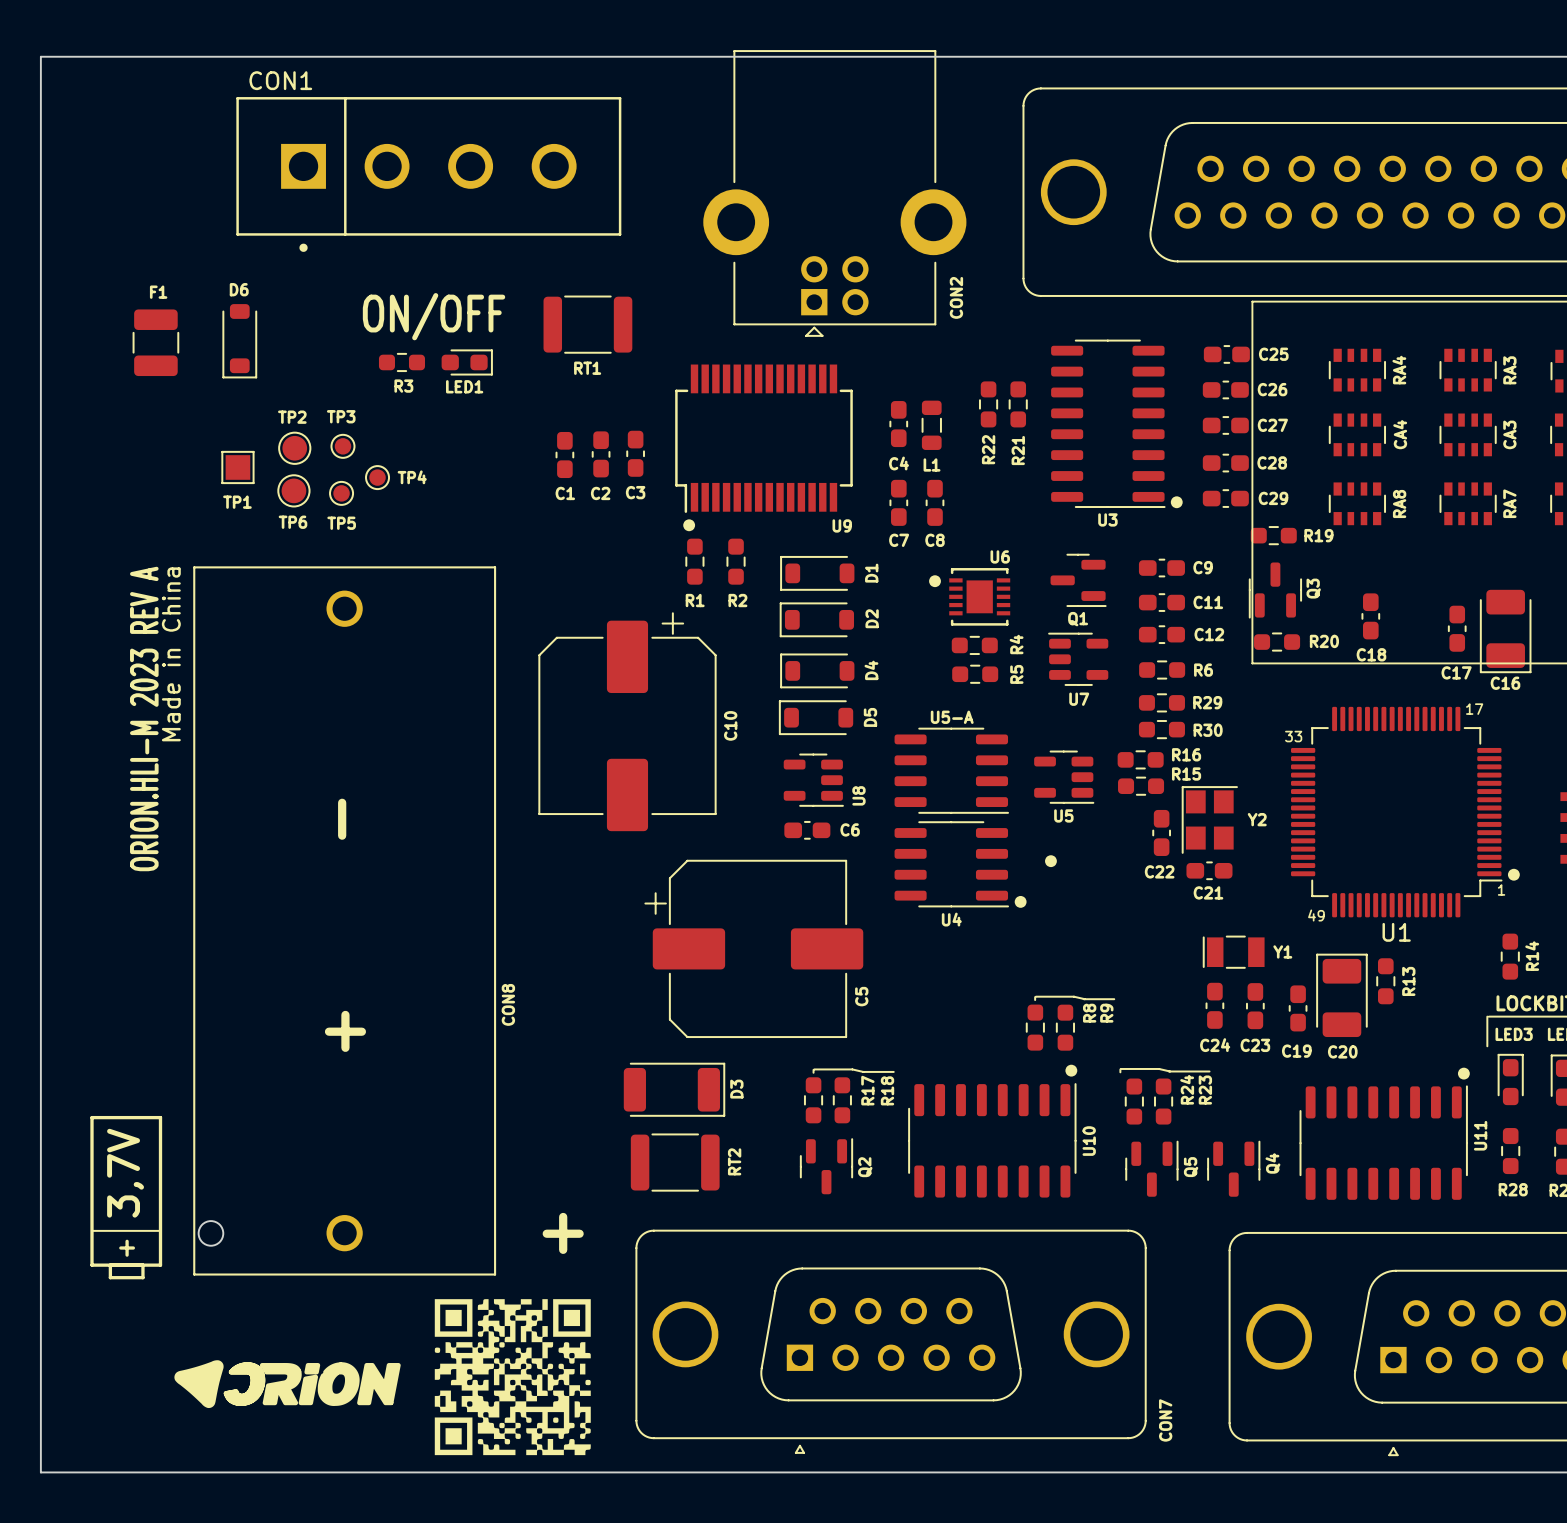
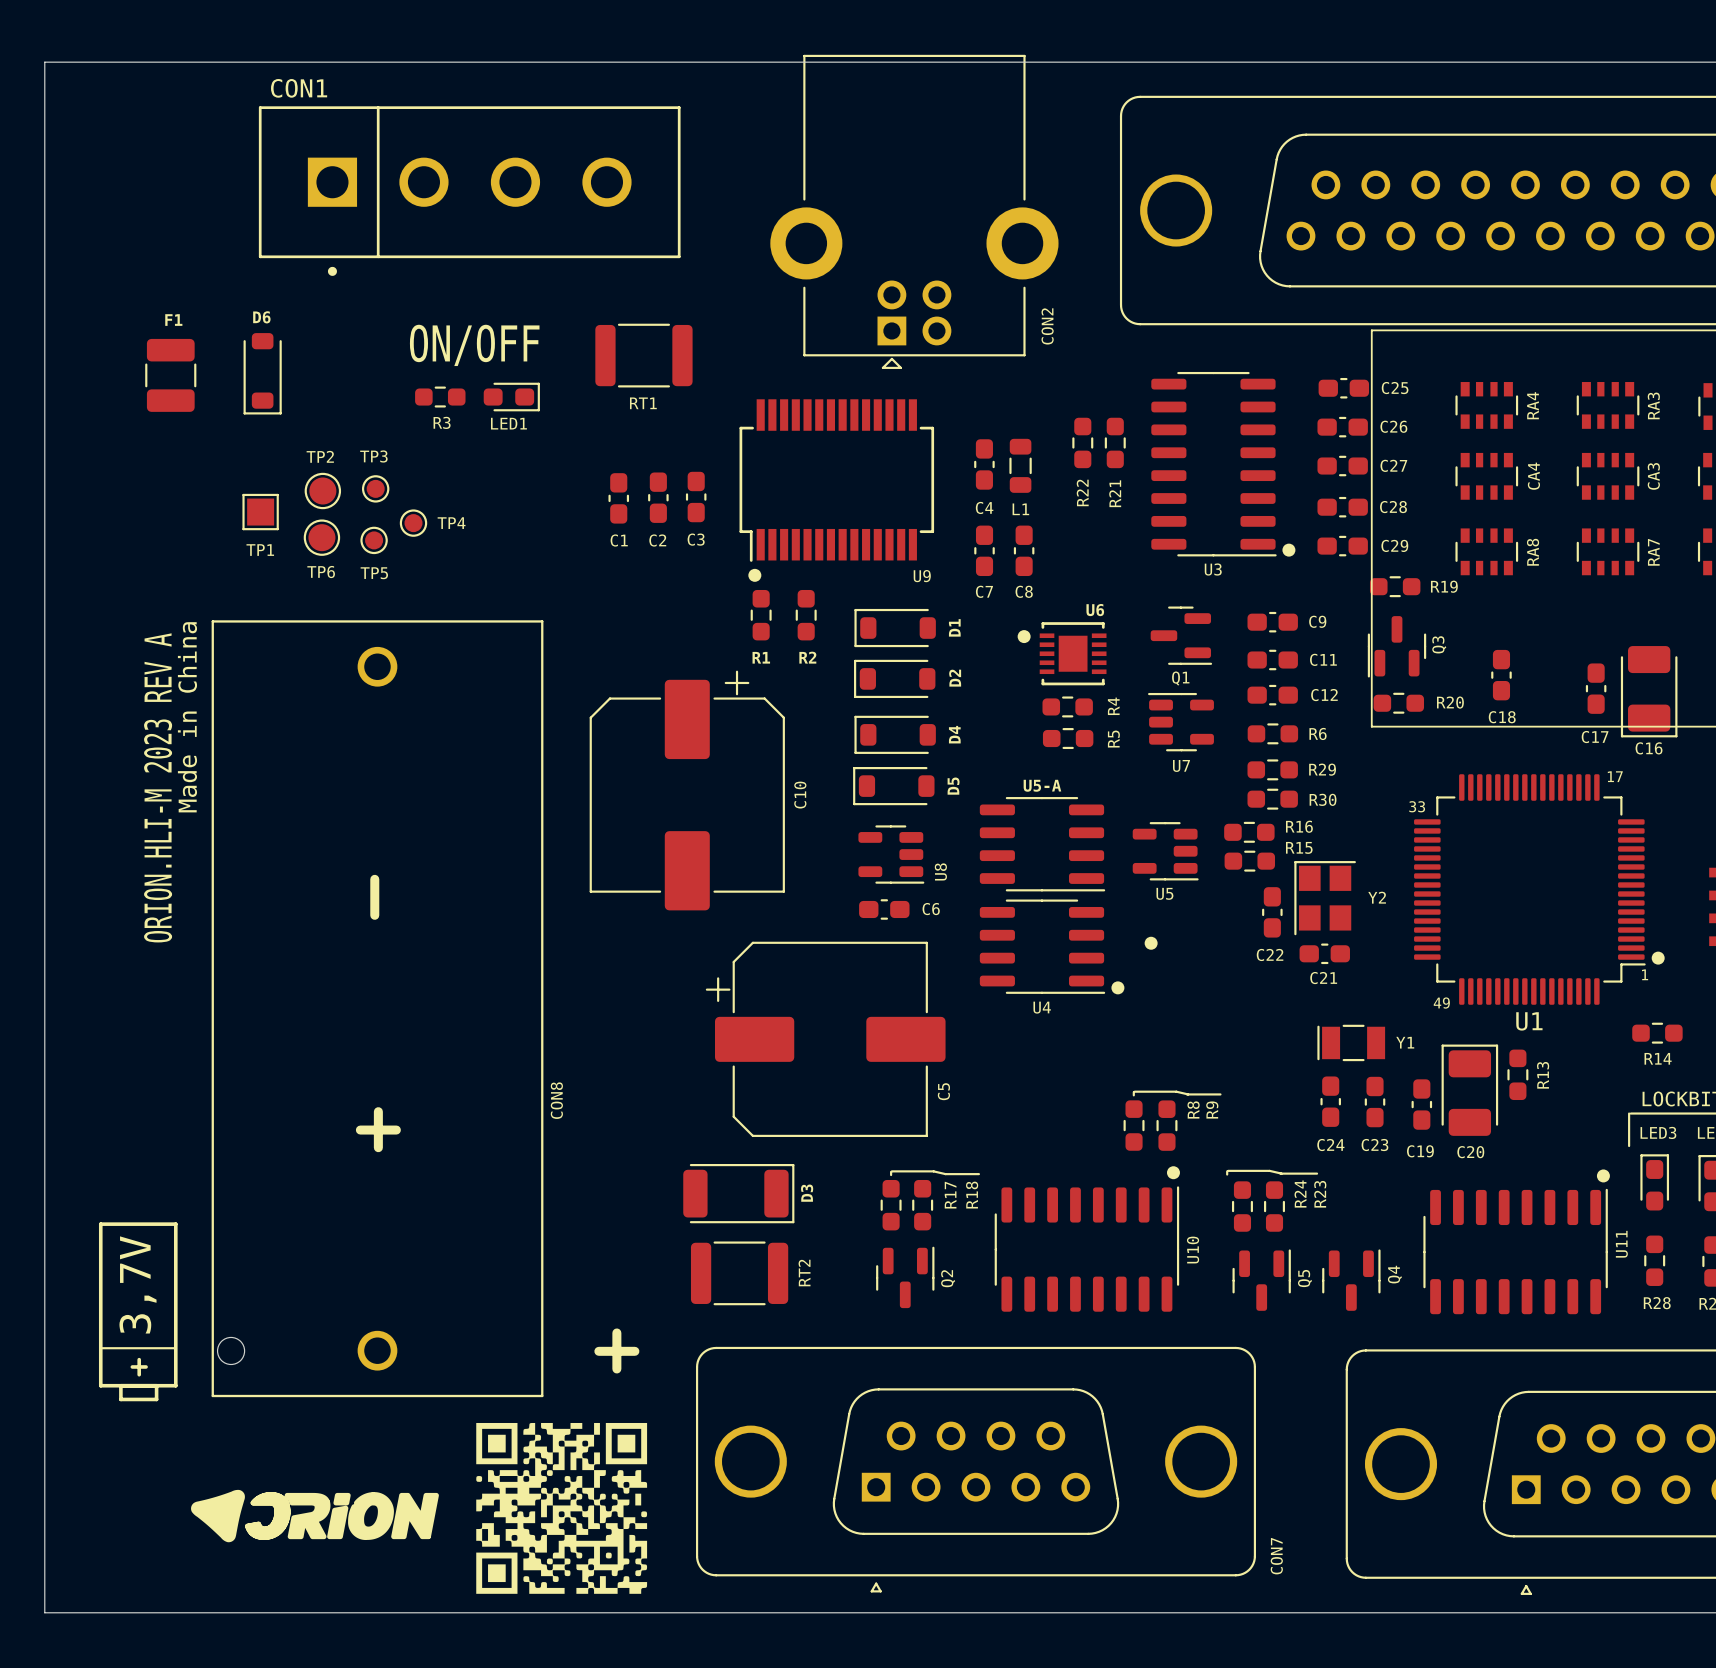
R14 rotation: 0° (1510, 956) -> 90° clockwise (1657, 1033)
line: (1202, 1071) (1209, 1071) -> none

